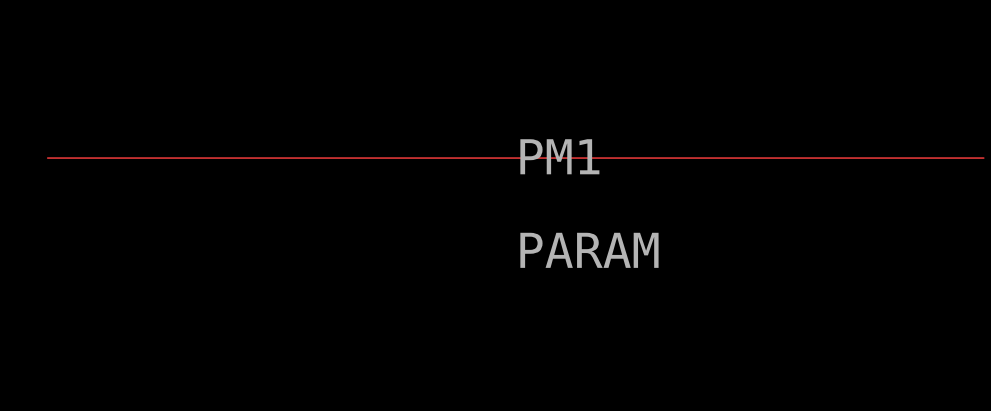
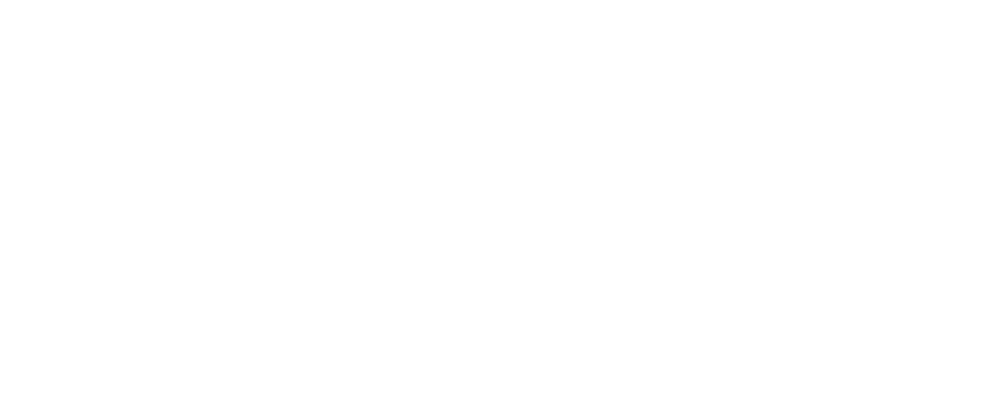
PM1: PARAM (515, 158) -> none

